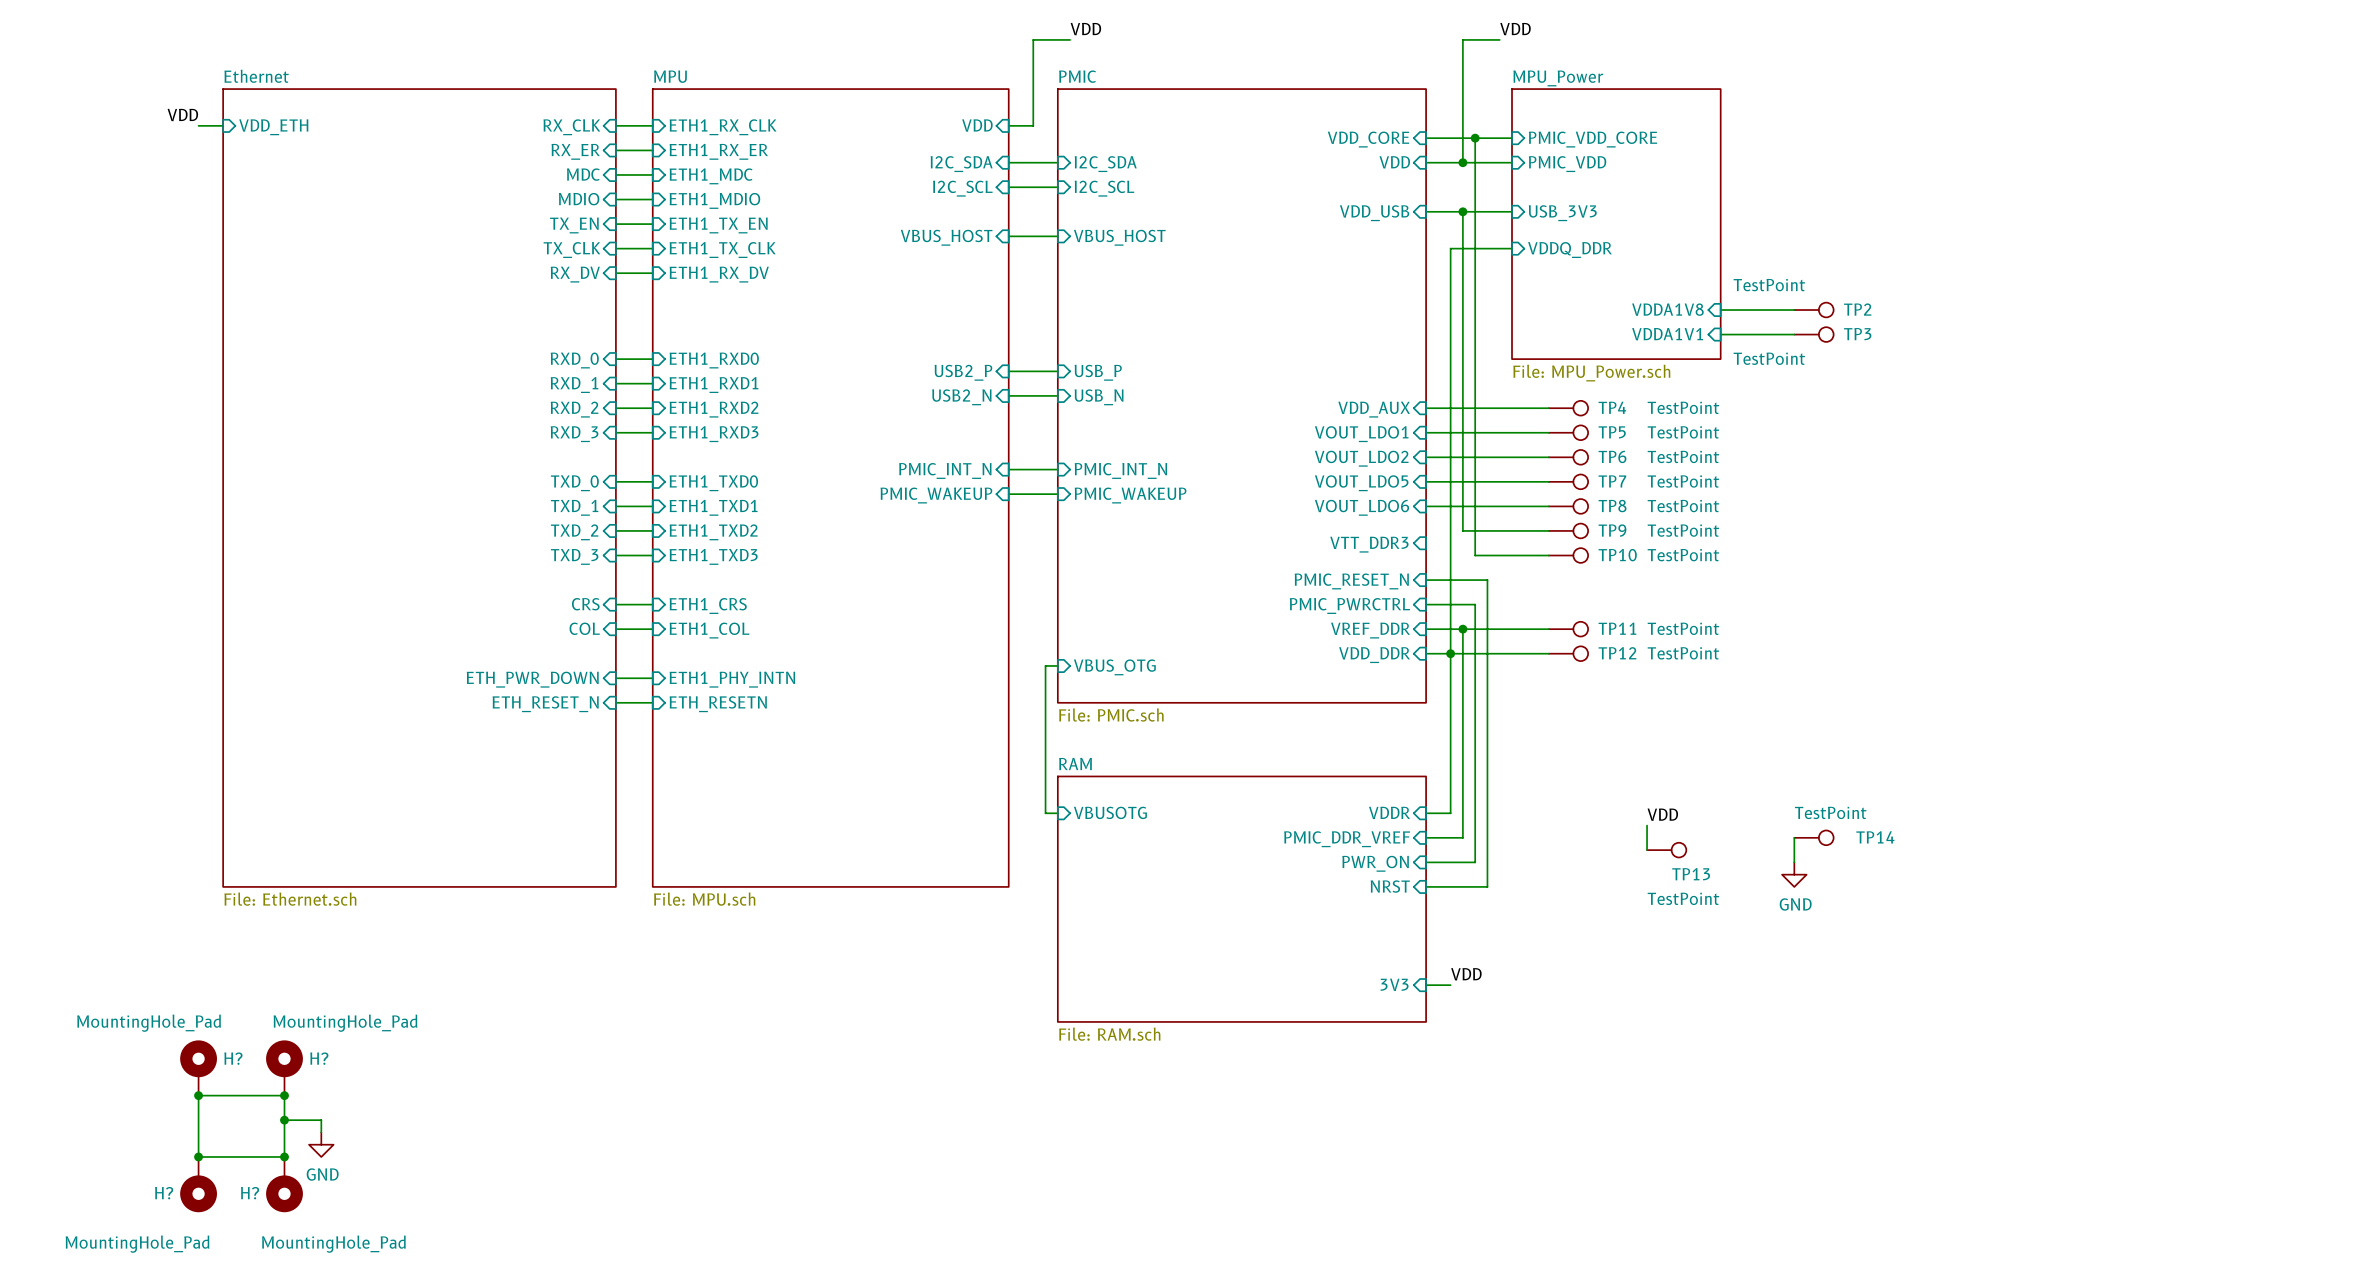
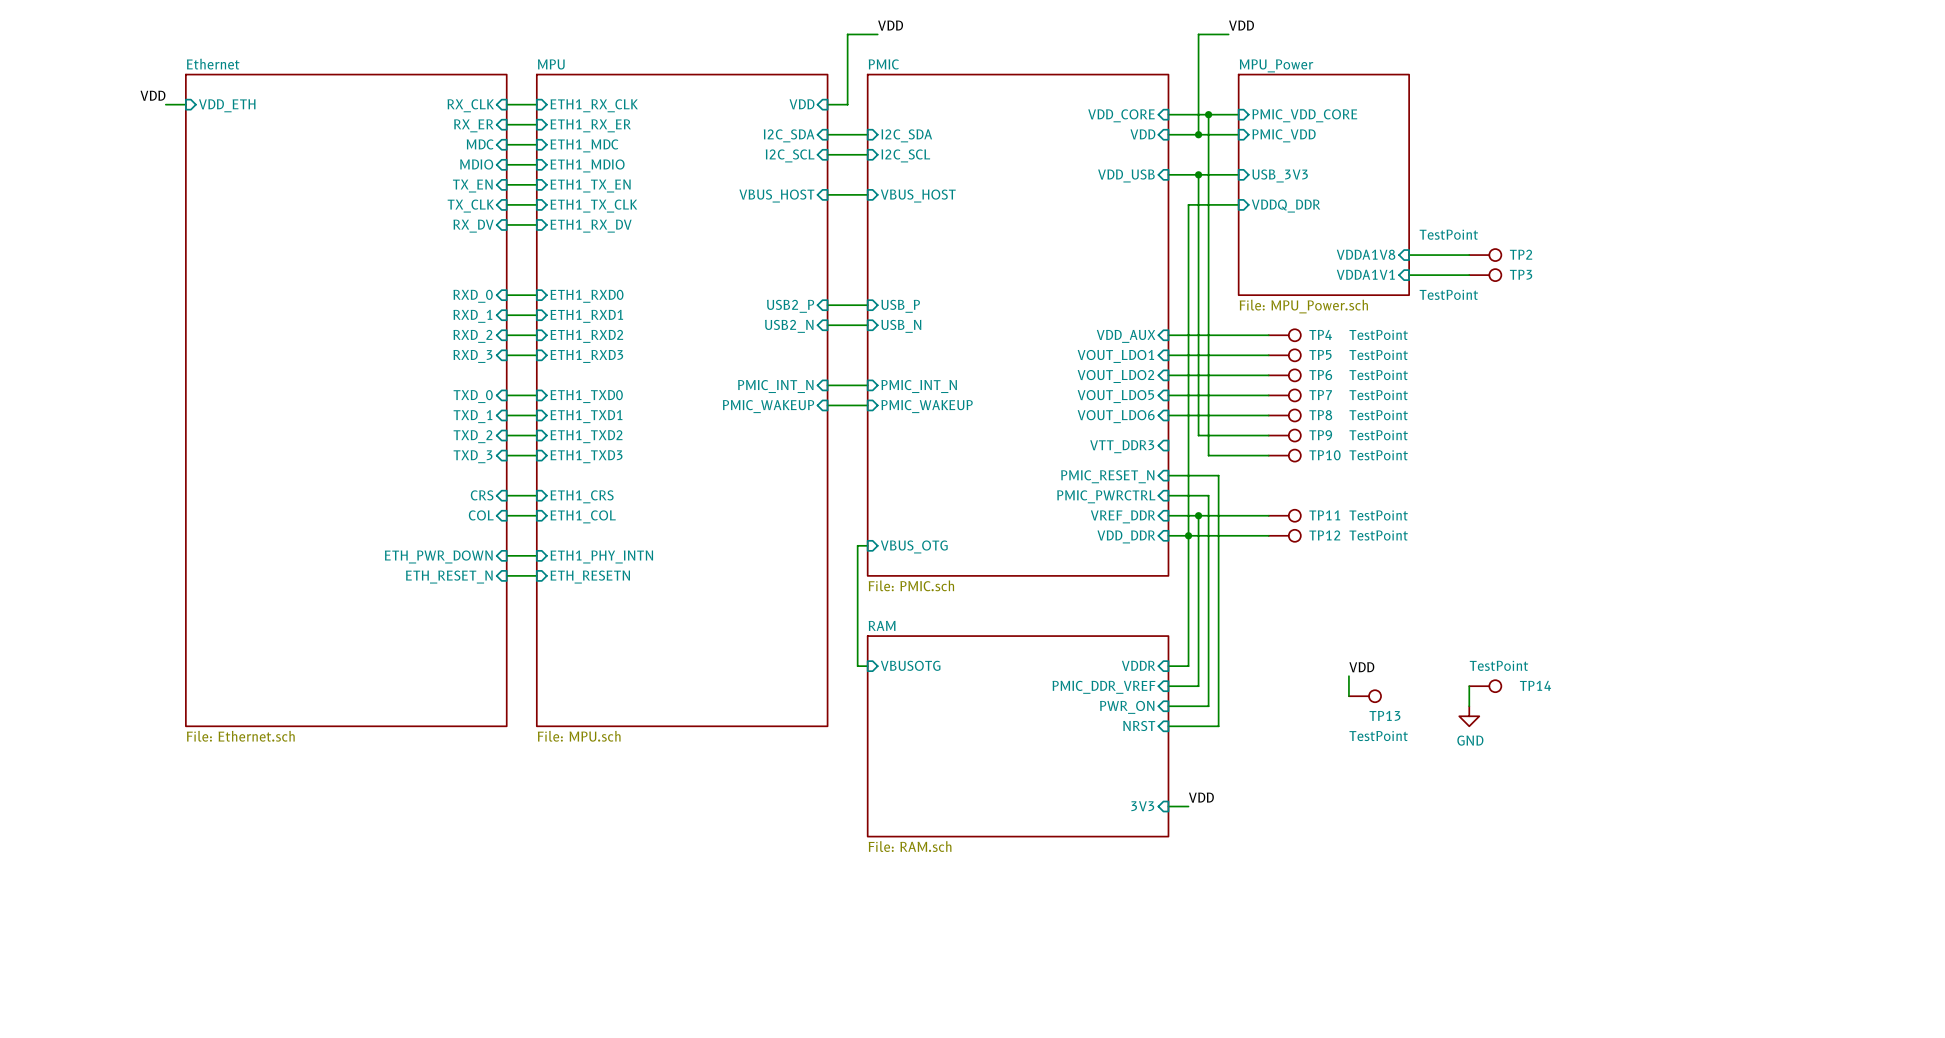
H?: MountingHole_Pad (198, 1068) -> none
H?: MountingHole_Pad (284, 1068) -> none
wire: (198, 1095) (284, 1095) (284, 1156) (198, 1156) (198, 1095) -> none
junction: (198, 1095) -> none
junction: (284, 1095) -> none
wire: (284, 1120) (321, 1120) (321, 1132) -> none
junction: (284, 1120) -> none
power symbol: GND (321, 1144) -> none
junction: (198, 1156) -> none
junction: (284, 1156) -> none
H?: MountingHole_Pad (198, 1184) -> none
H?: MountingHole_Pad (284, 1184) -> none

